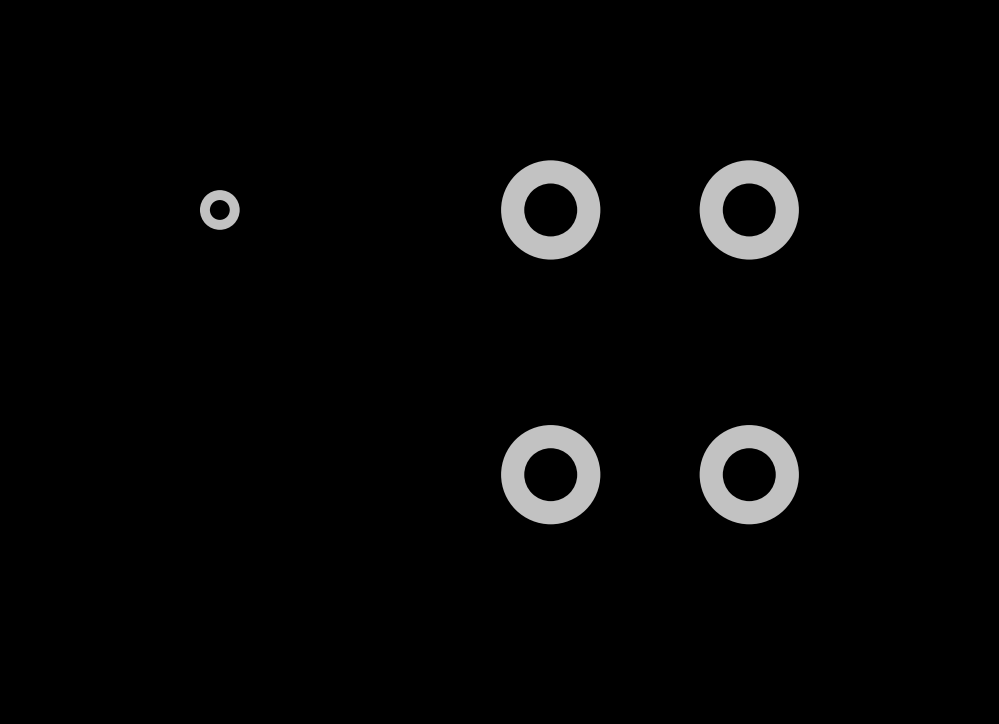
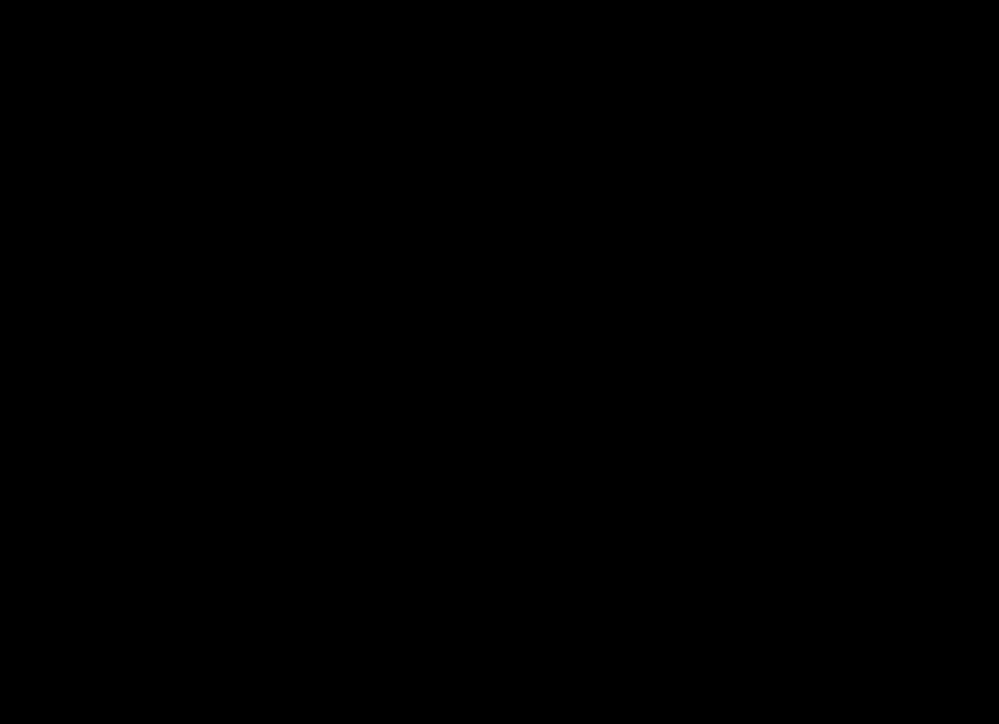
via: (219, 209) -> none
via: (550, 209) -> none
via: (749, 209) -> none
via: (550, 474) -> none
via: (749, 474) -> none

